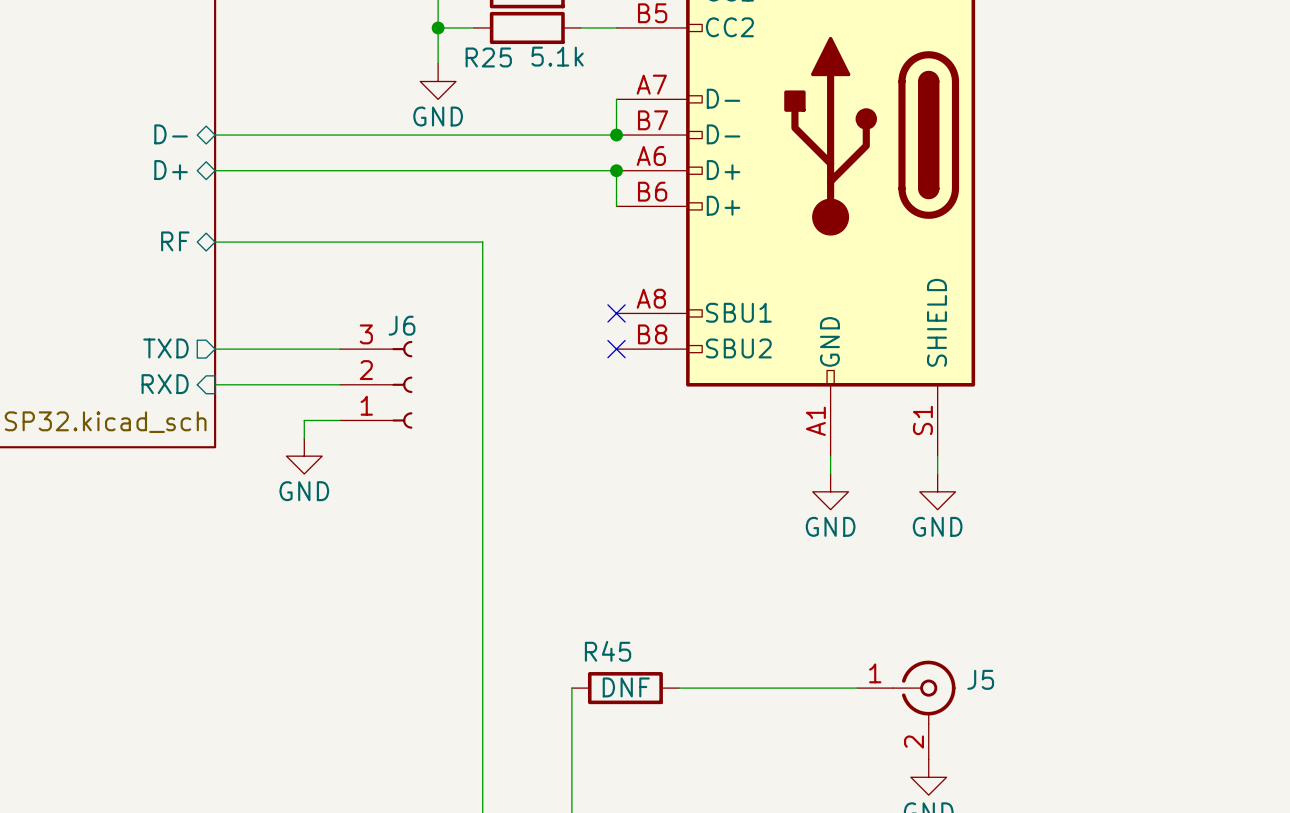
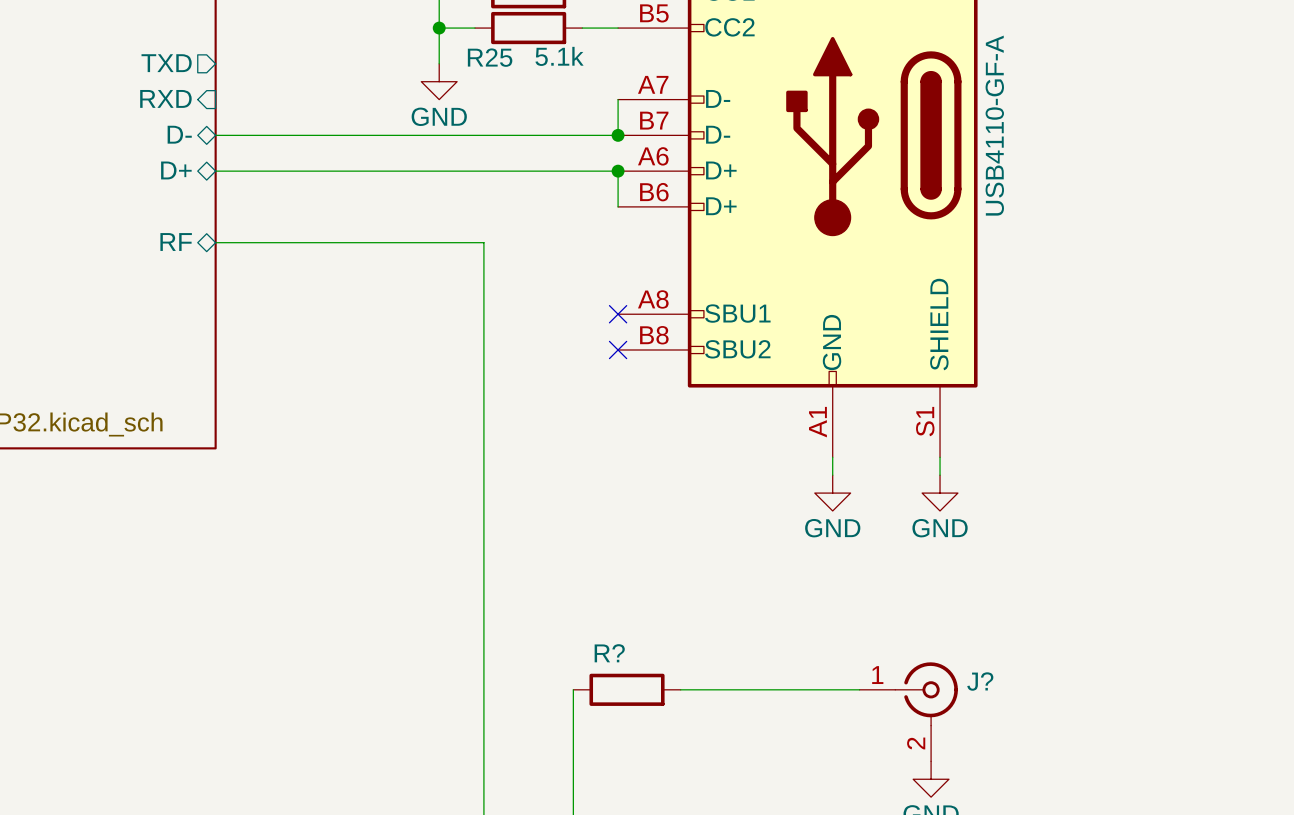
part value: none -> USB4110-GF-A (994, 125)
sheet pin position: TXD (165, 348) -> TXD (166, 63)
wire: (215, 349) (339, 349) -> none
sheet pin position: RXD (165, 384) -> RXD (165, 98)
wire: (215, 384) (339, 384) -> none
J6: (376, 384) -> none
wire: (339, 420) (304, 420) (304, 438) -> none
power symbol: GND (304, 456) -> none
R45 name: R45 (608, 651) -> R? (609, 653)
J5 name: J5 (980, 679) -> J? (980, 681)
R45 value: DNF (626, 687) -> none

